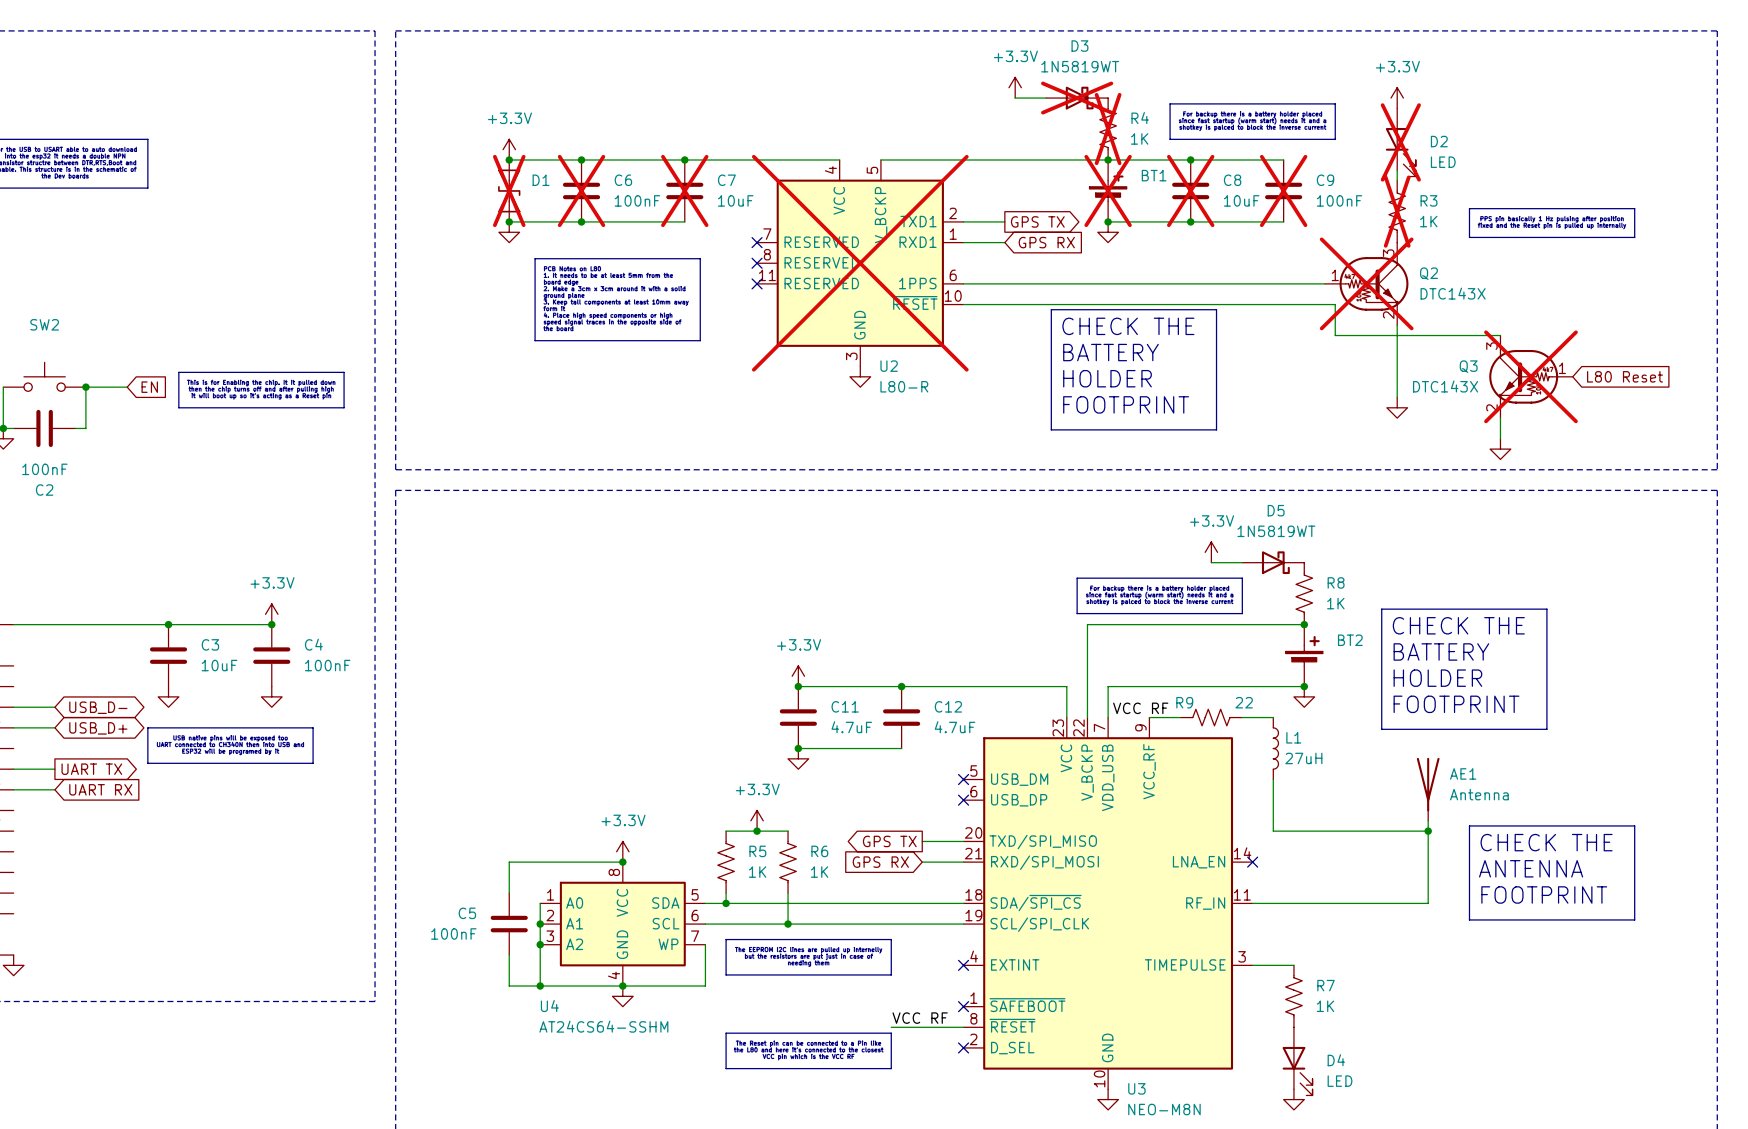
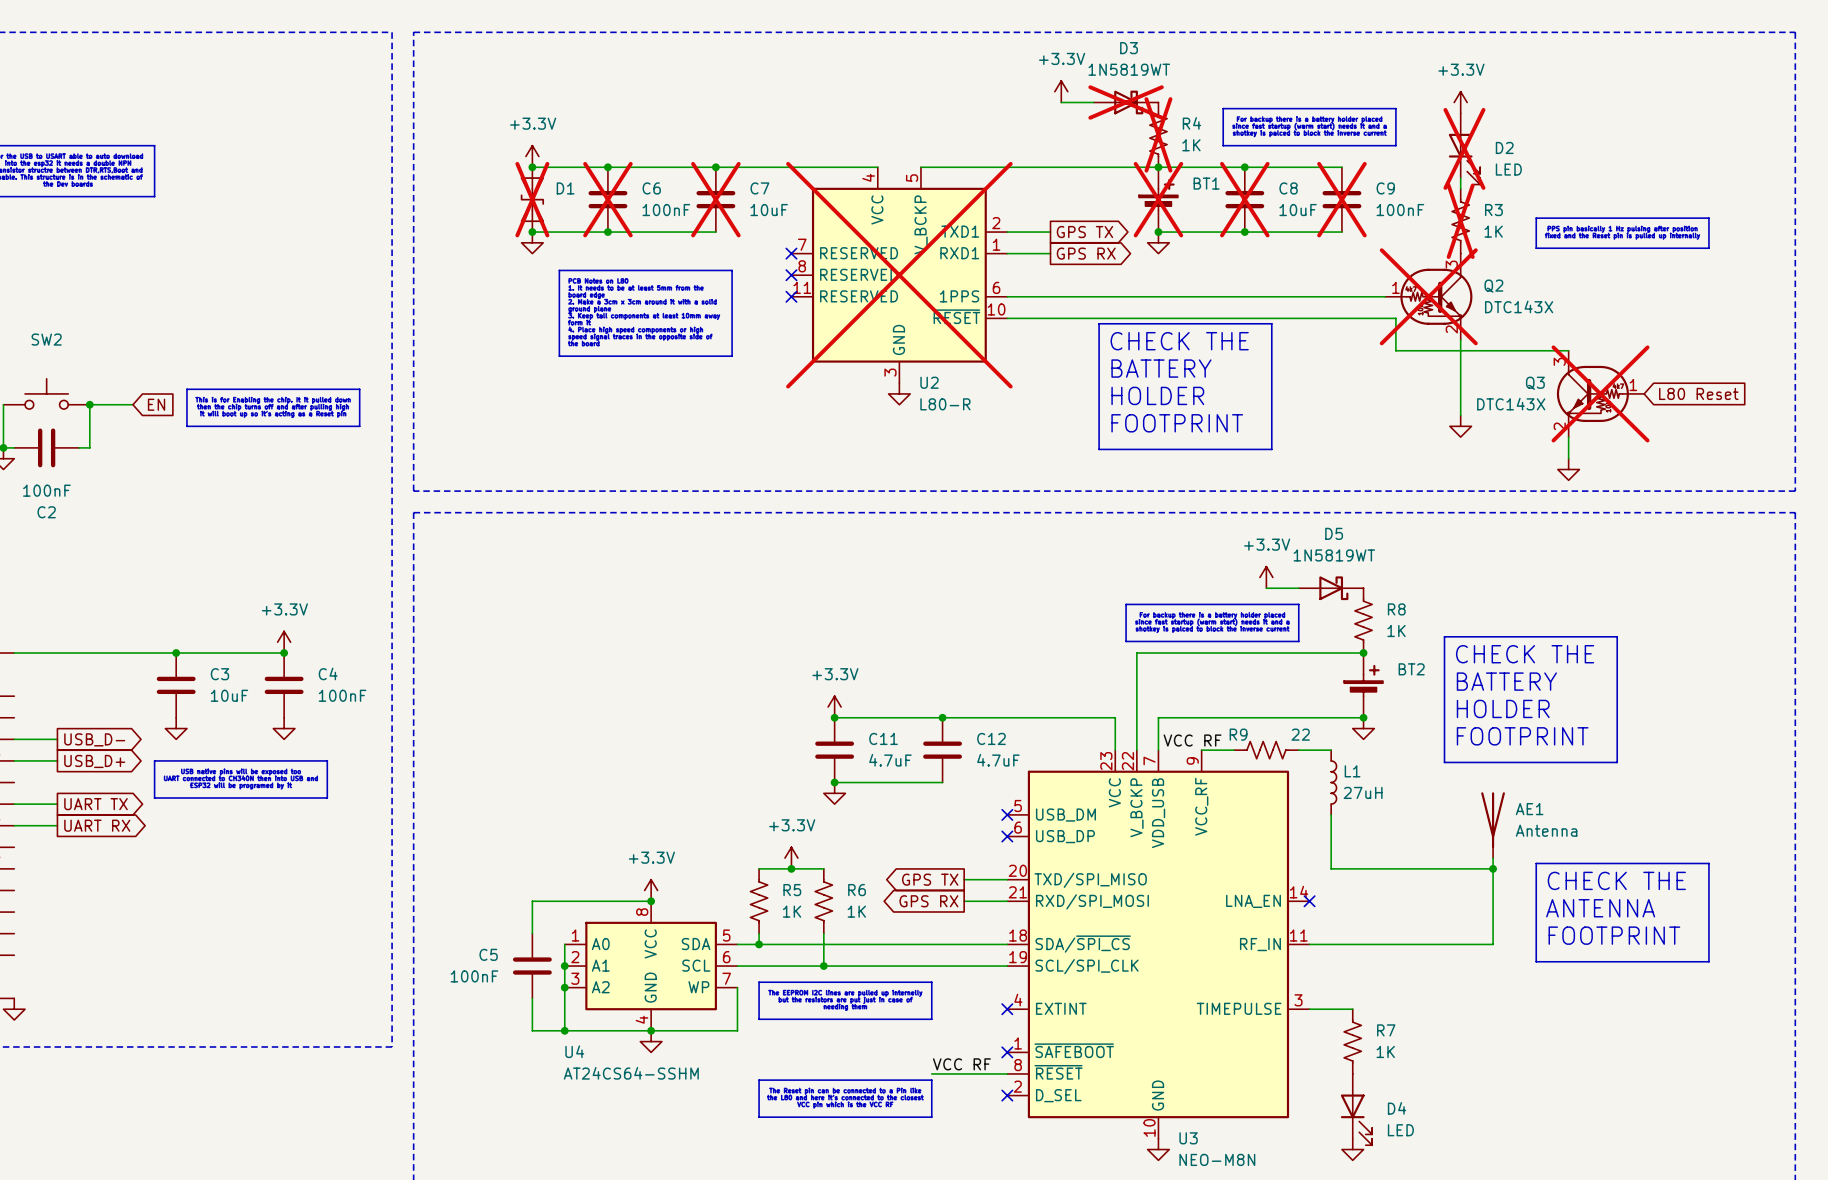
global label shape: input (1046, 242) -> output (1086, 253)
global label shape: bidirectional (98, 707) -> output (94, 739)
global label shape: bidirectional (98, 728) -> output (94, 761)
global label shape: input (100, 789) -> output (97, 825)
global label shape: input (880, 862) -> output (928, 901)

